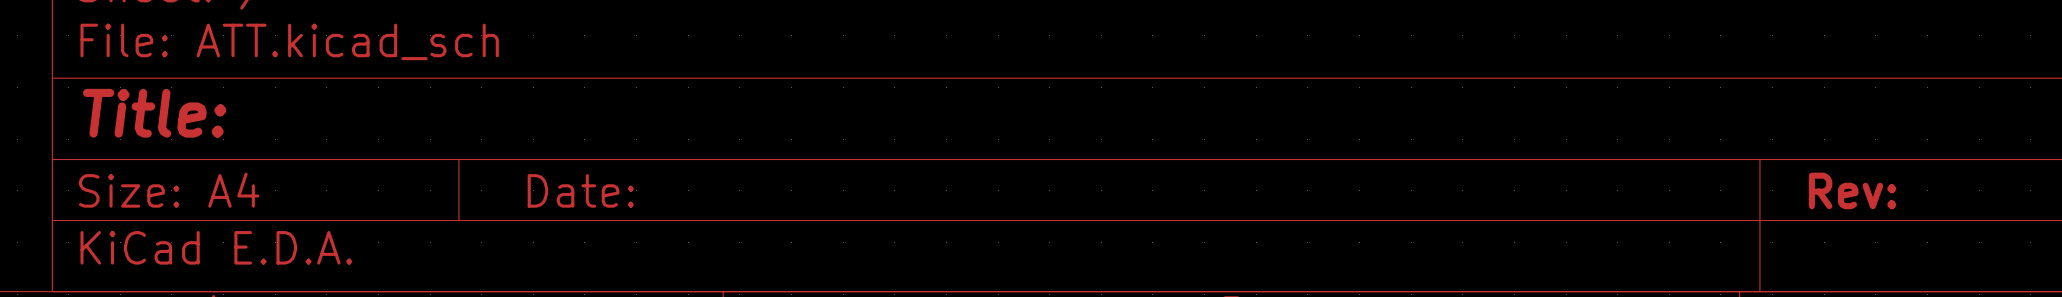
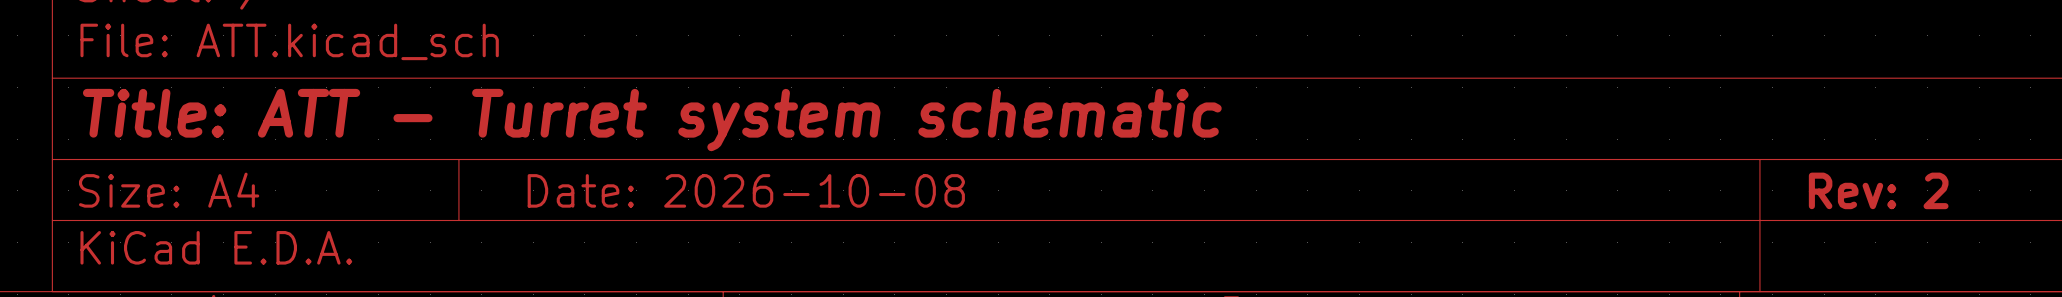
title block: Title: (154, 113) -> Title: ATT - Turret system schematic (652, 120)
title block: Date: (580, 190) -> Date: 2026-10-08 (746, 190)
title block: Rev: (1852, 190) -> Rev: 2 (1878, 190)

